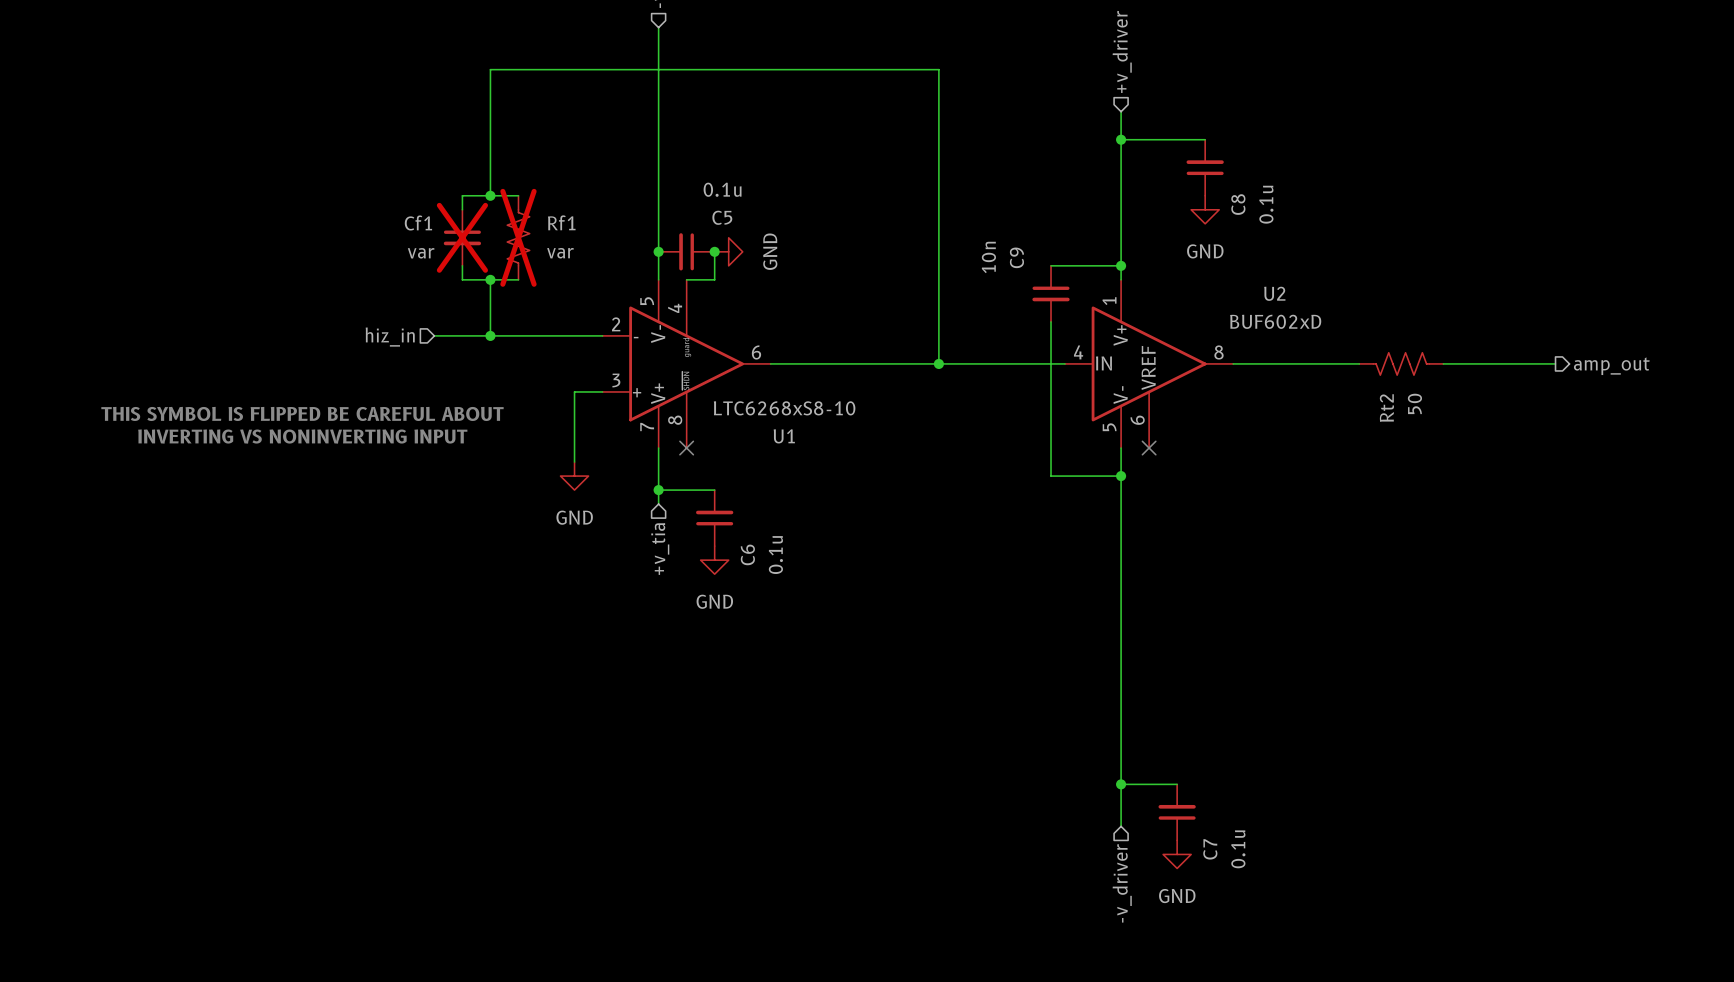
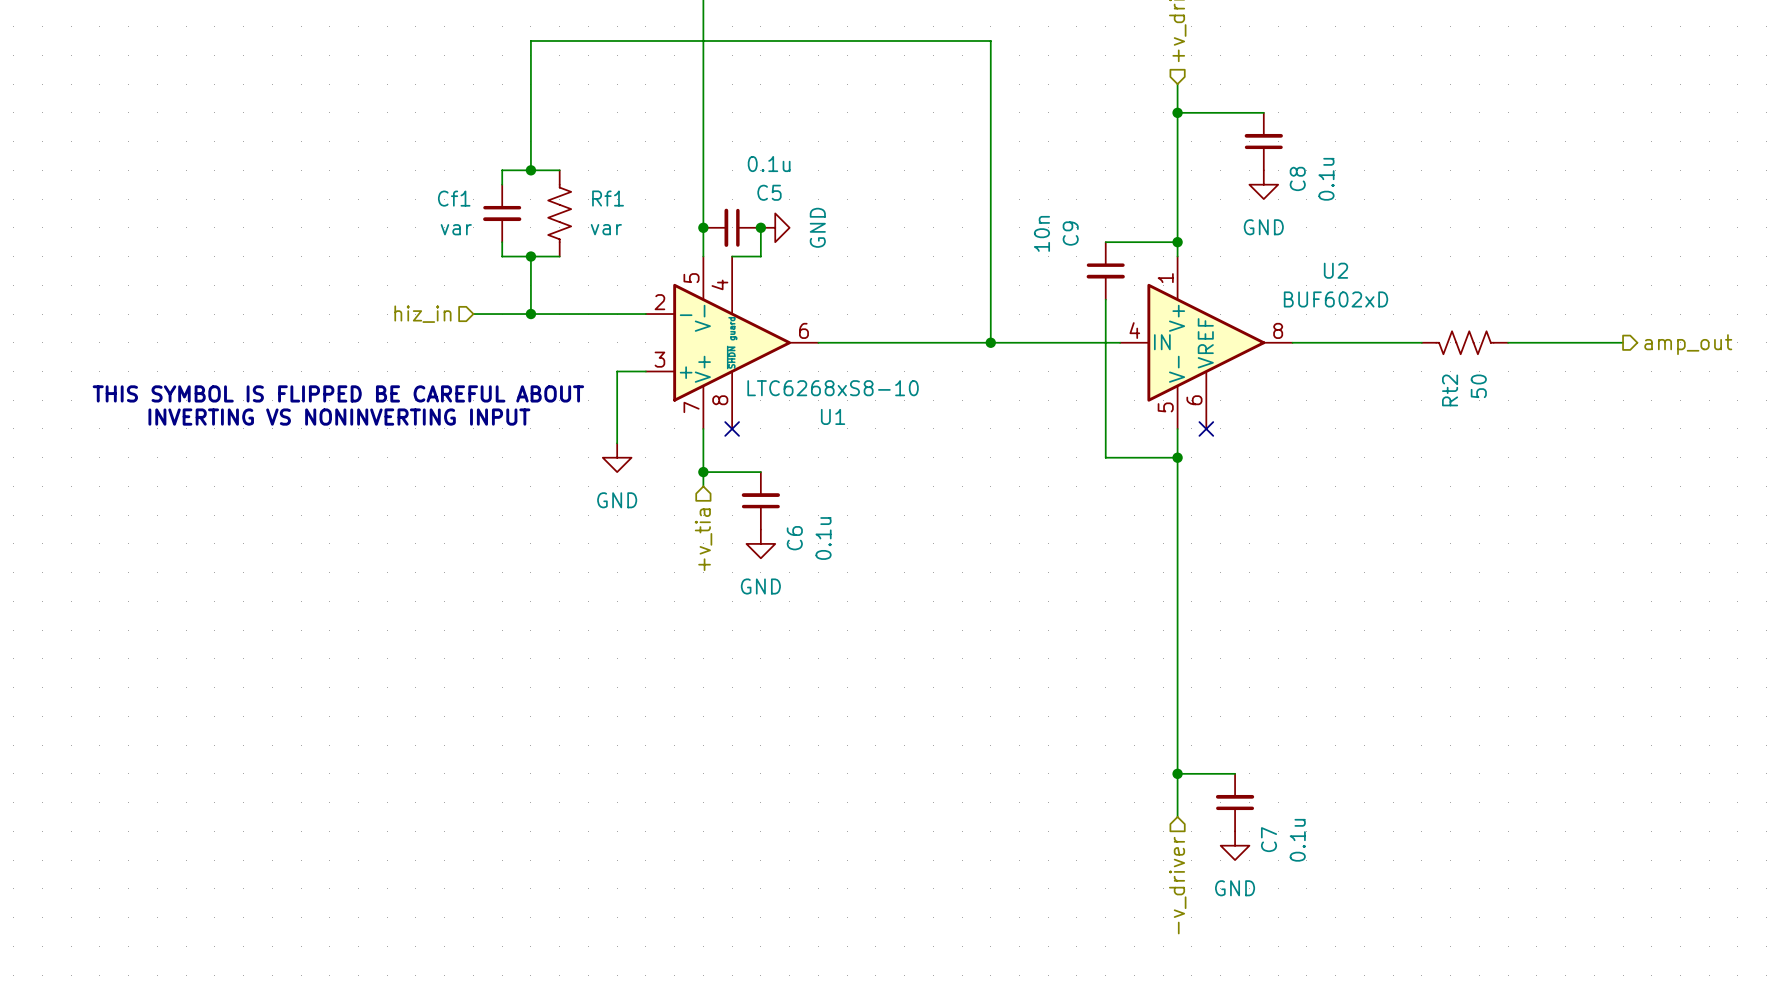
Cf1 do-not-place cross: (462, 237) -> none
Rf1 do-not-place cross: (518, 237) -> none

